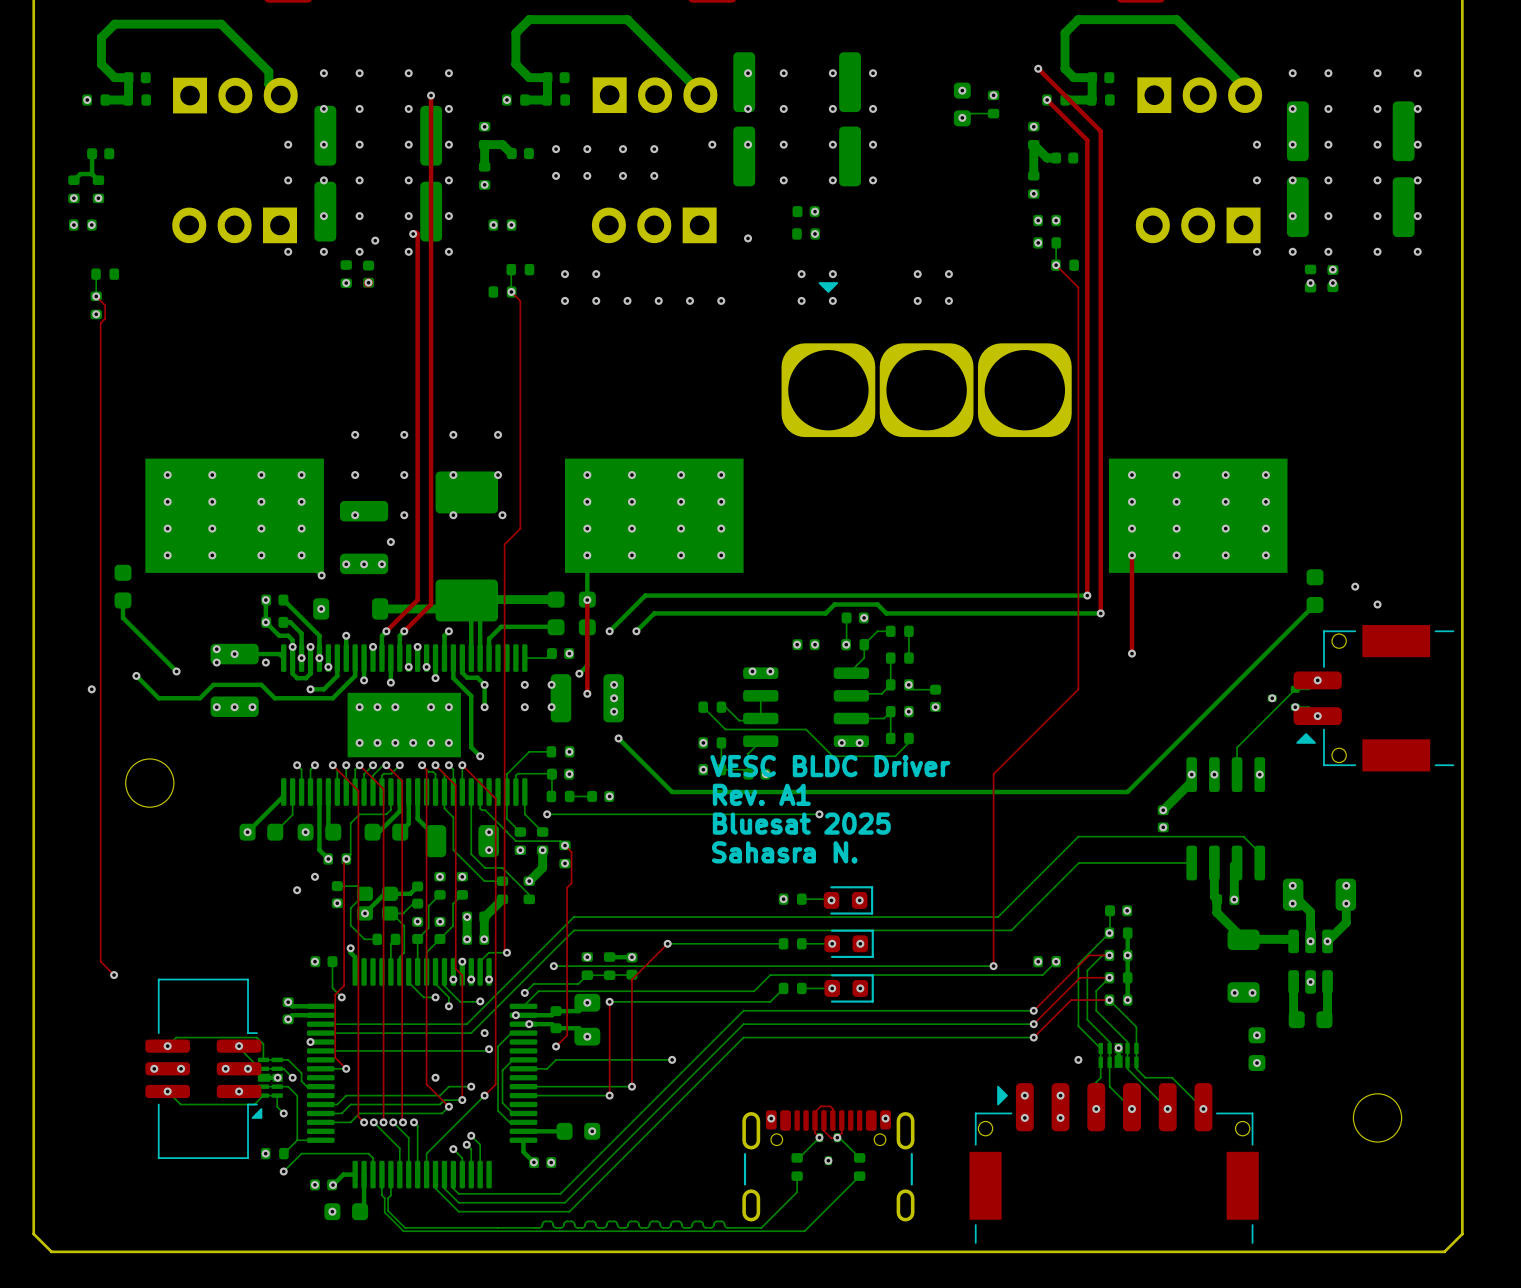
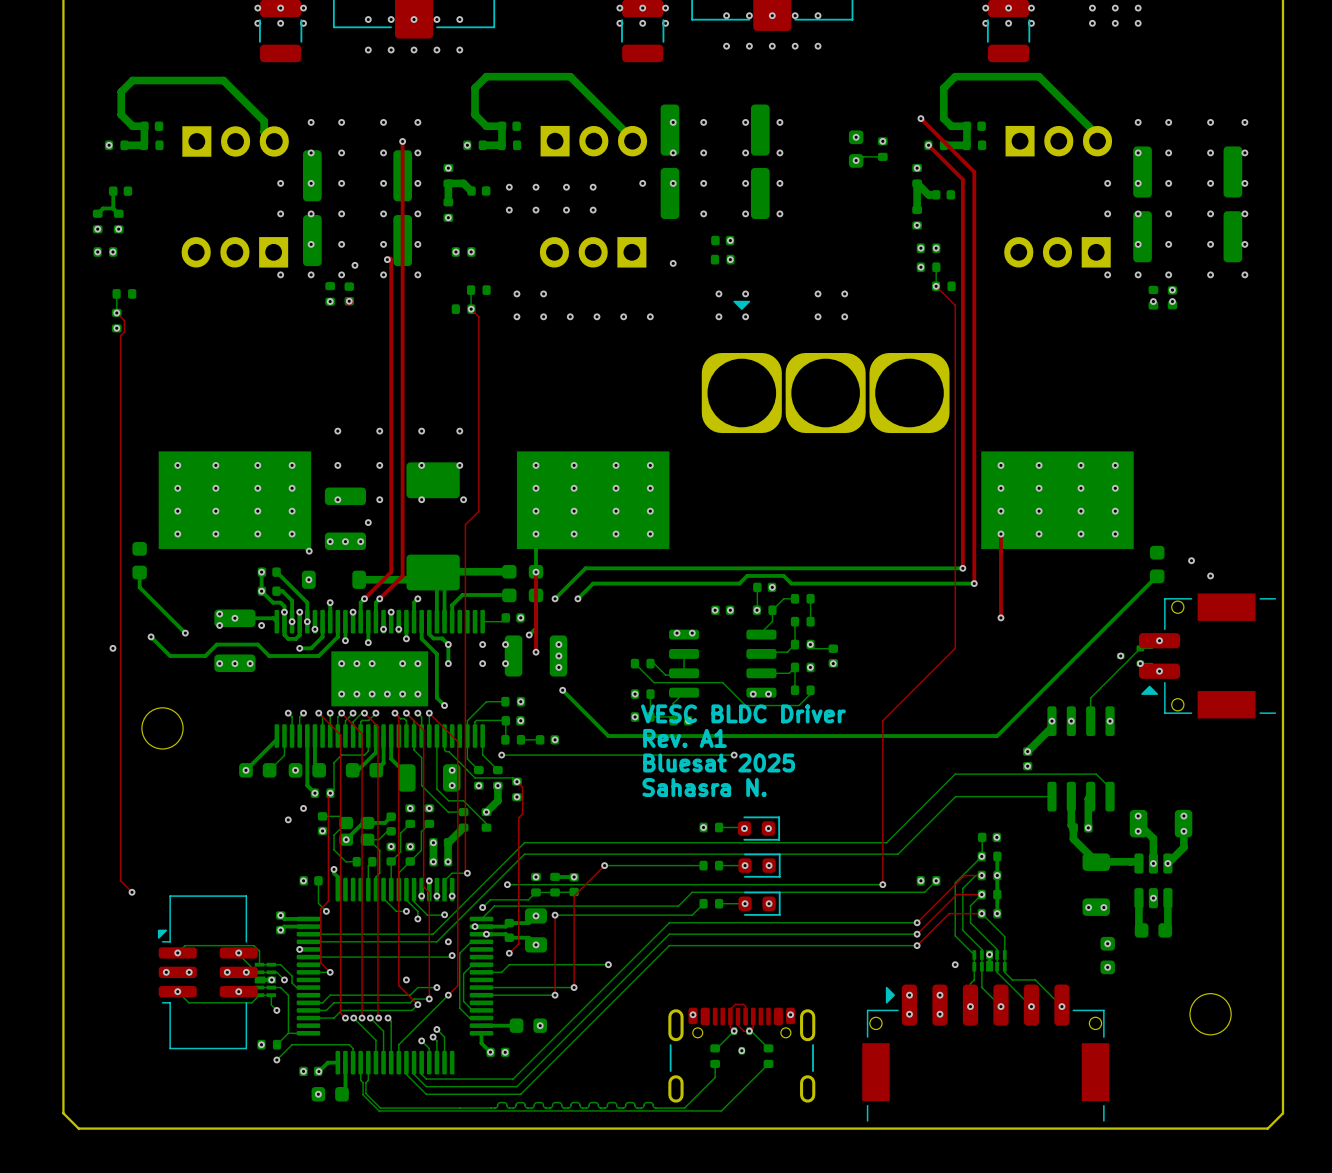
part rotation: 0° (203, 1068) -> 180° (207, 972)

